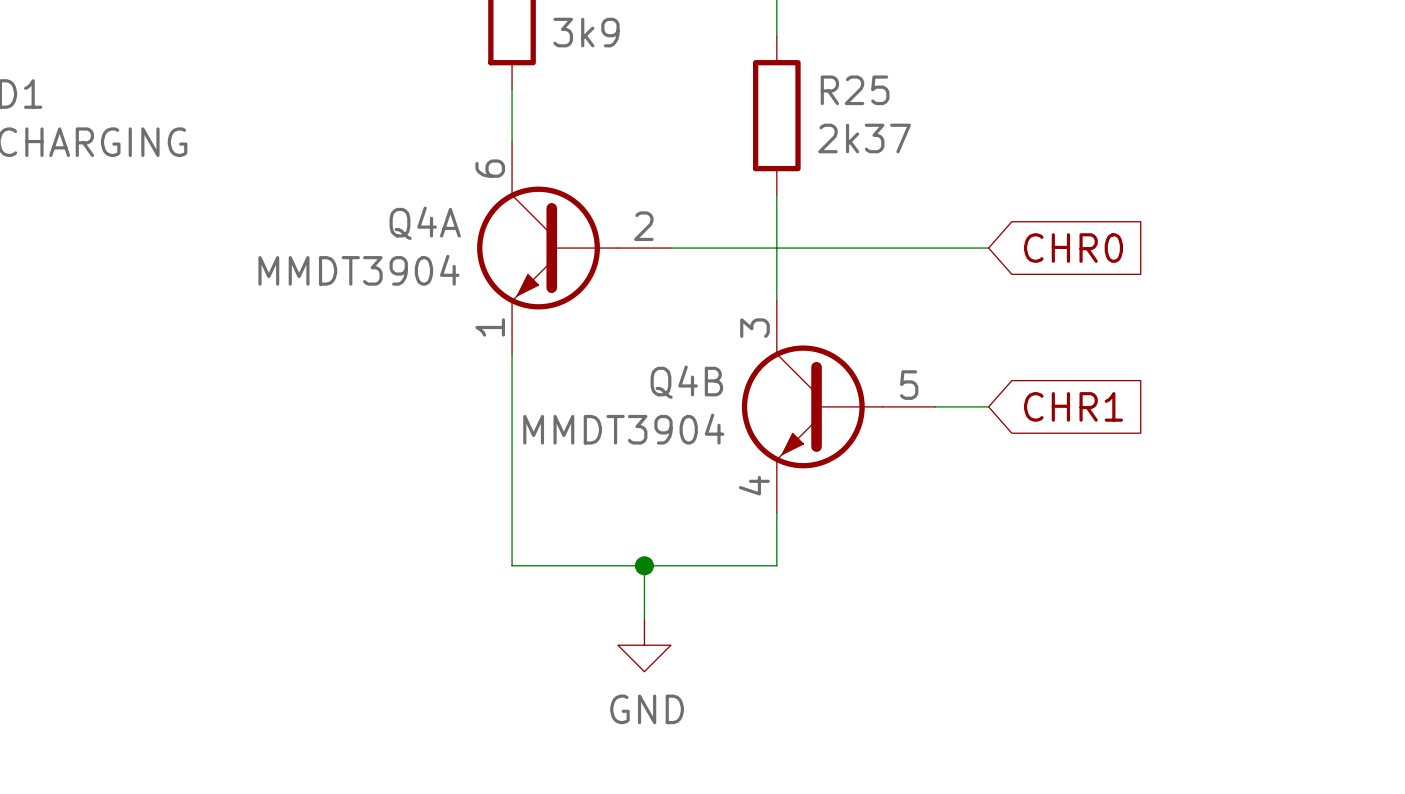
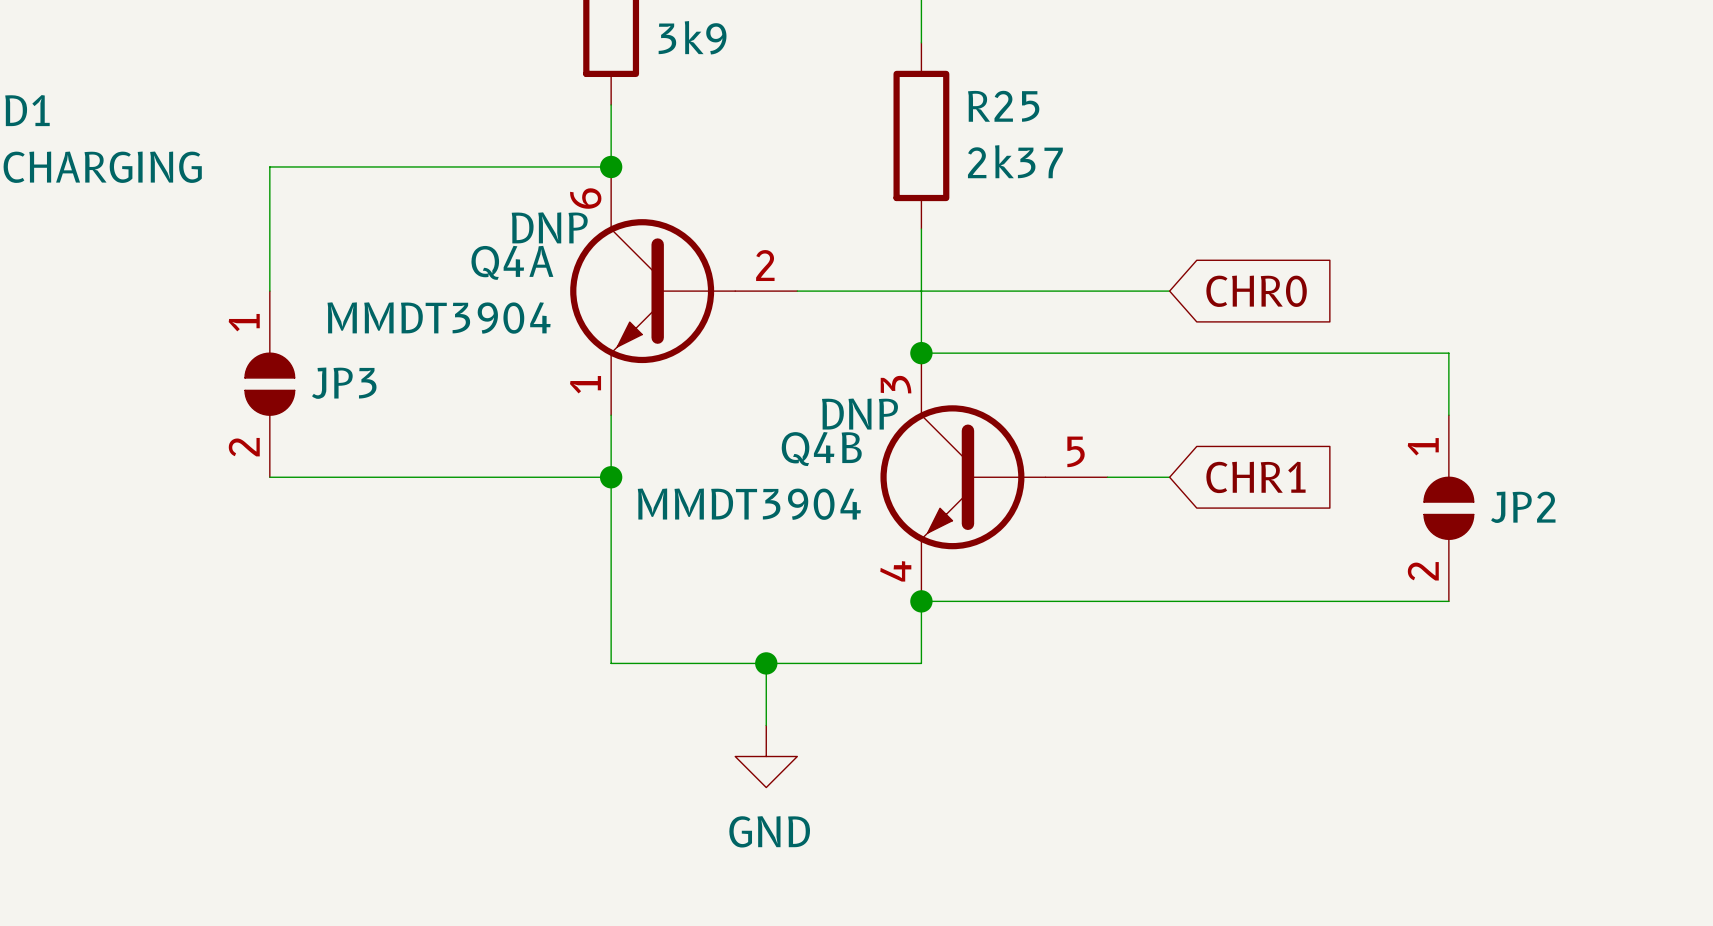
wire: none -> (611, 166) (269, 166) (269, 291)
junction: none -> (611, 166)
Q4A text: none -> DNP (549, 227)
wire: none -> (921, 353) (1448, 353) (1448, 415)
junction: none -> (921, 353)
JP3: none -> (269, 384)
Q4B text: none -> DNP (859, 414)
wire: none -> (269, 477) (611, 477)
junction: none -> (611, 477)
JP2: none -> (1448, 508)
wire: none -> (921, 601) (1448, 601)
junction: none -> (921, 601)

